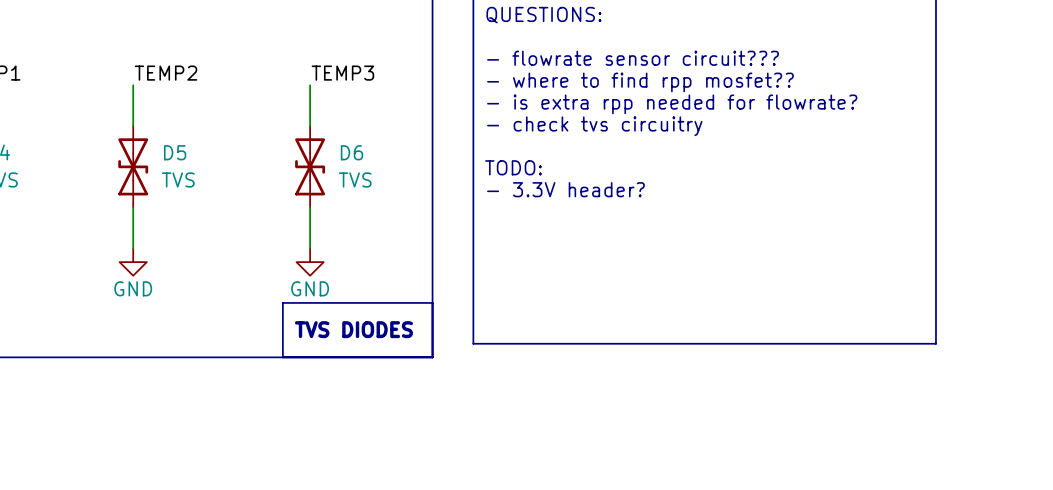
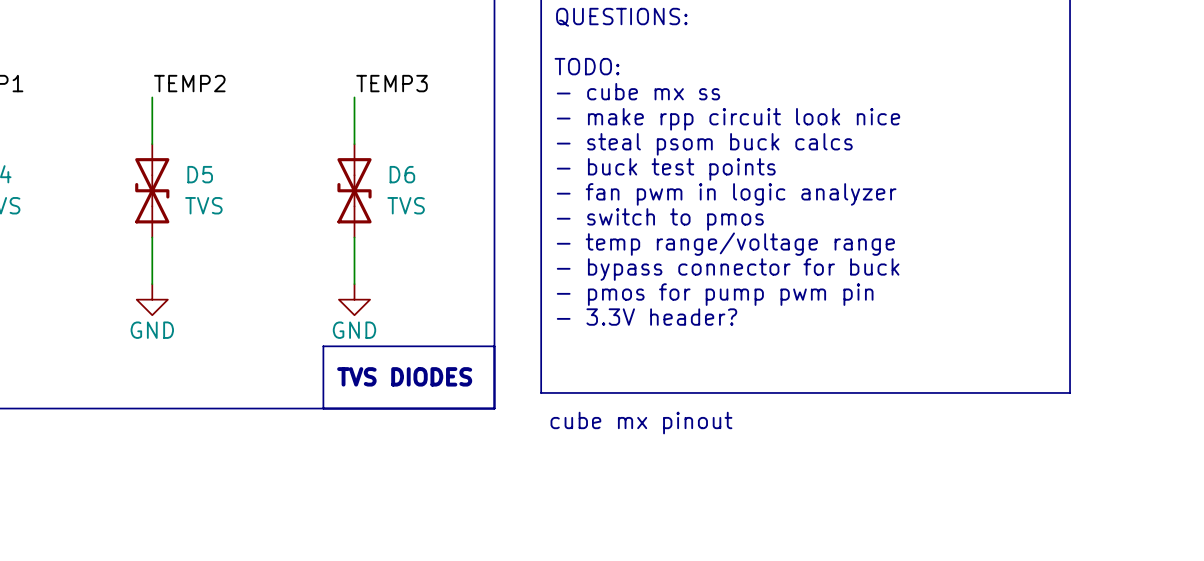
text: - flowrate sensor circuit??? (633, 58) -> TODO: (587, 66)
text: - where to find rpp mosfet?? (640, 82) -> - cube mx ss (638, 91)
text: - is extra rpp needed for flowrate? (672, 104) -> - make rpp circuit look nice (728, 119)
text: - check tvs circuitry (594, 126) -> - steal psom buck calcs (704, 144)
text: none -> - buck test points (666, 169)
text: TODO: (513, 167) -> - fan pwm in logic analyzer (726, 194)
text: - 3.3V header? (565, 189) -> - switch to pmos (660, 219)
text: none -> - temp range/voltage range (725, 244)
text: none -> - bypass connector for buck (728, 269)
text: none -> - pmos for pump pwm pin (715, 294)
text: none -> - 3.3V header? (647, 317)
text: none -> cube mx pinout (641, 423)

